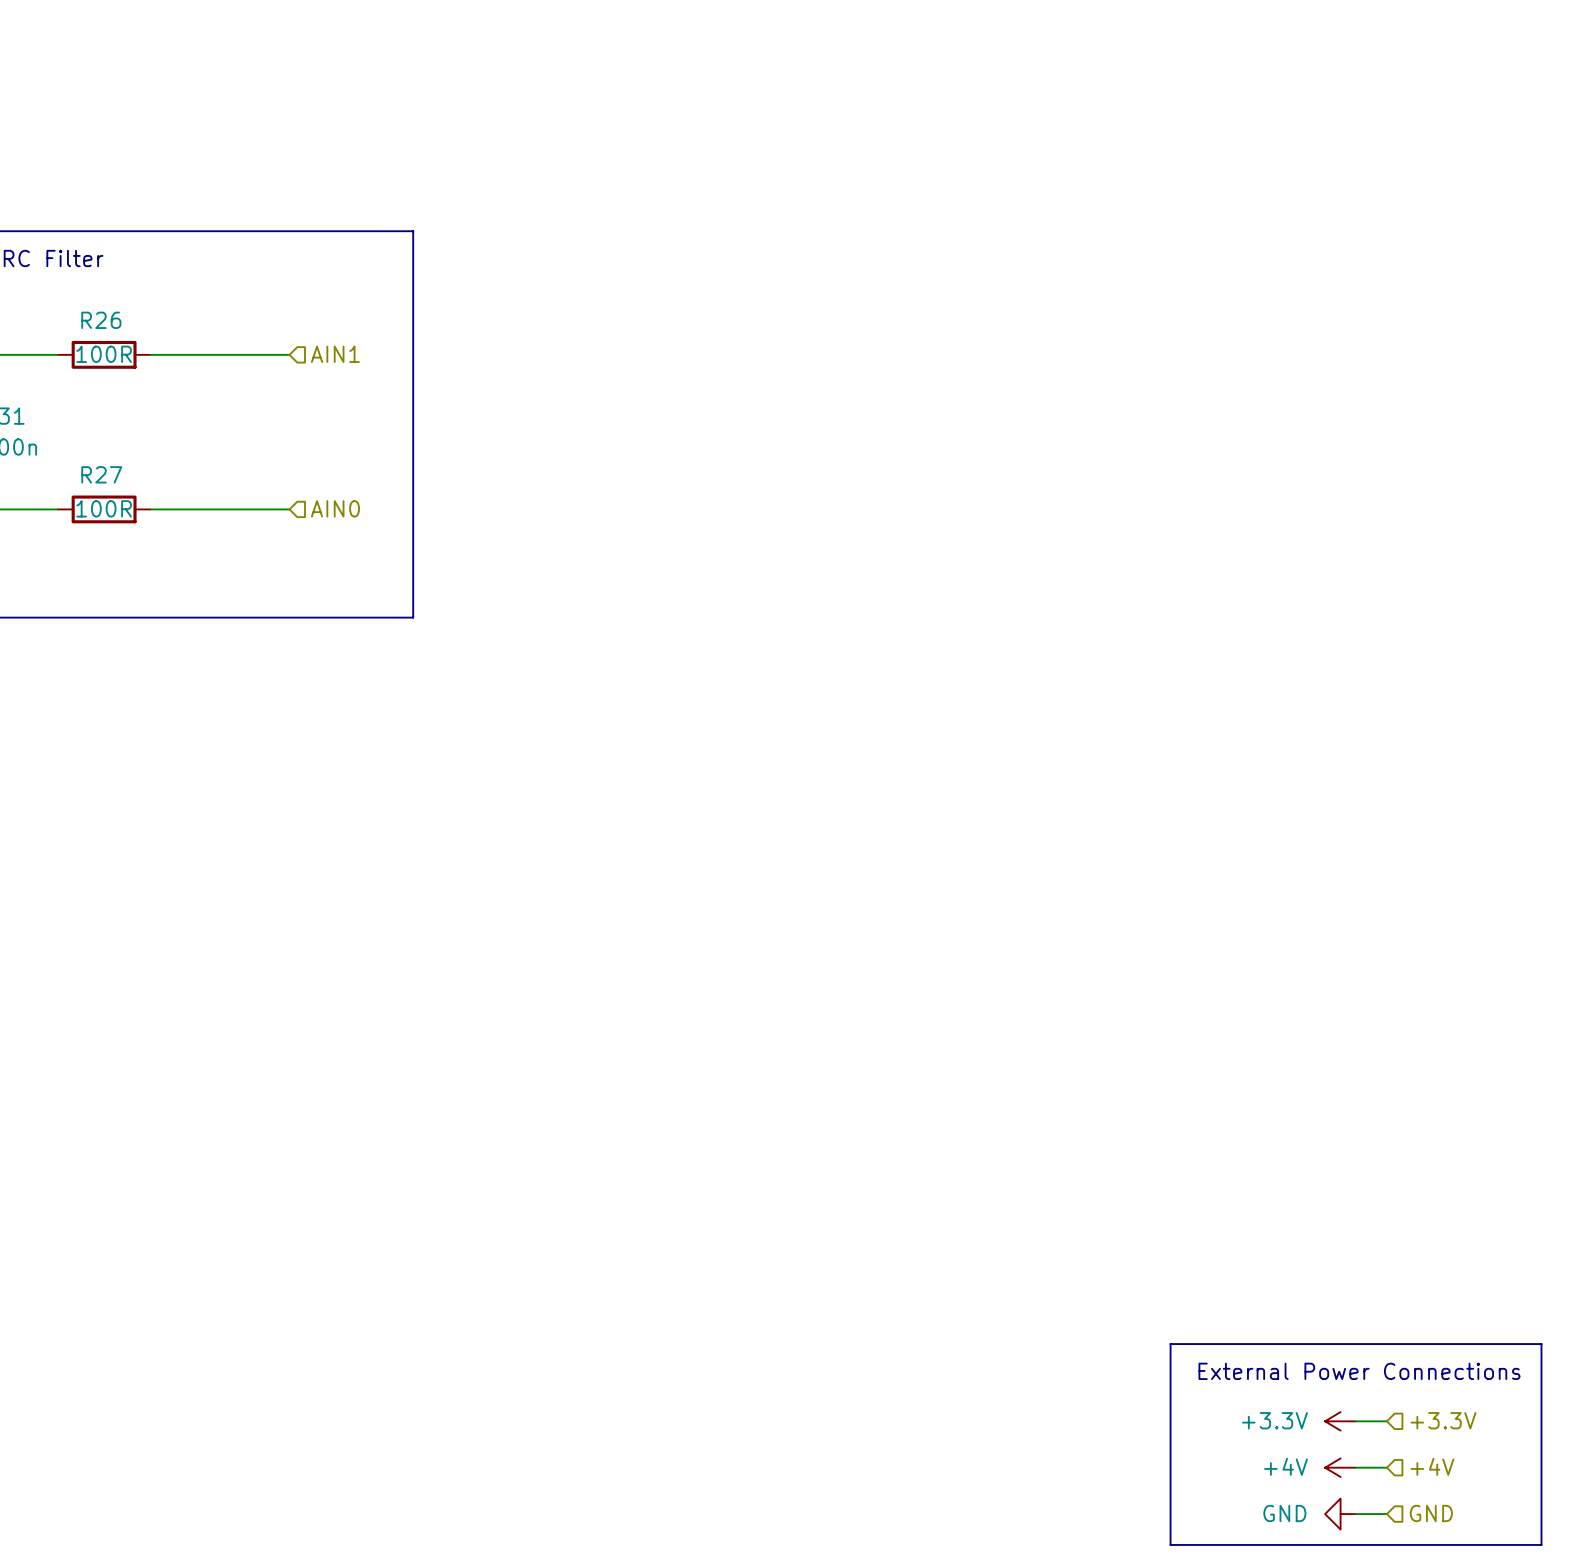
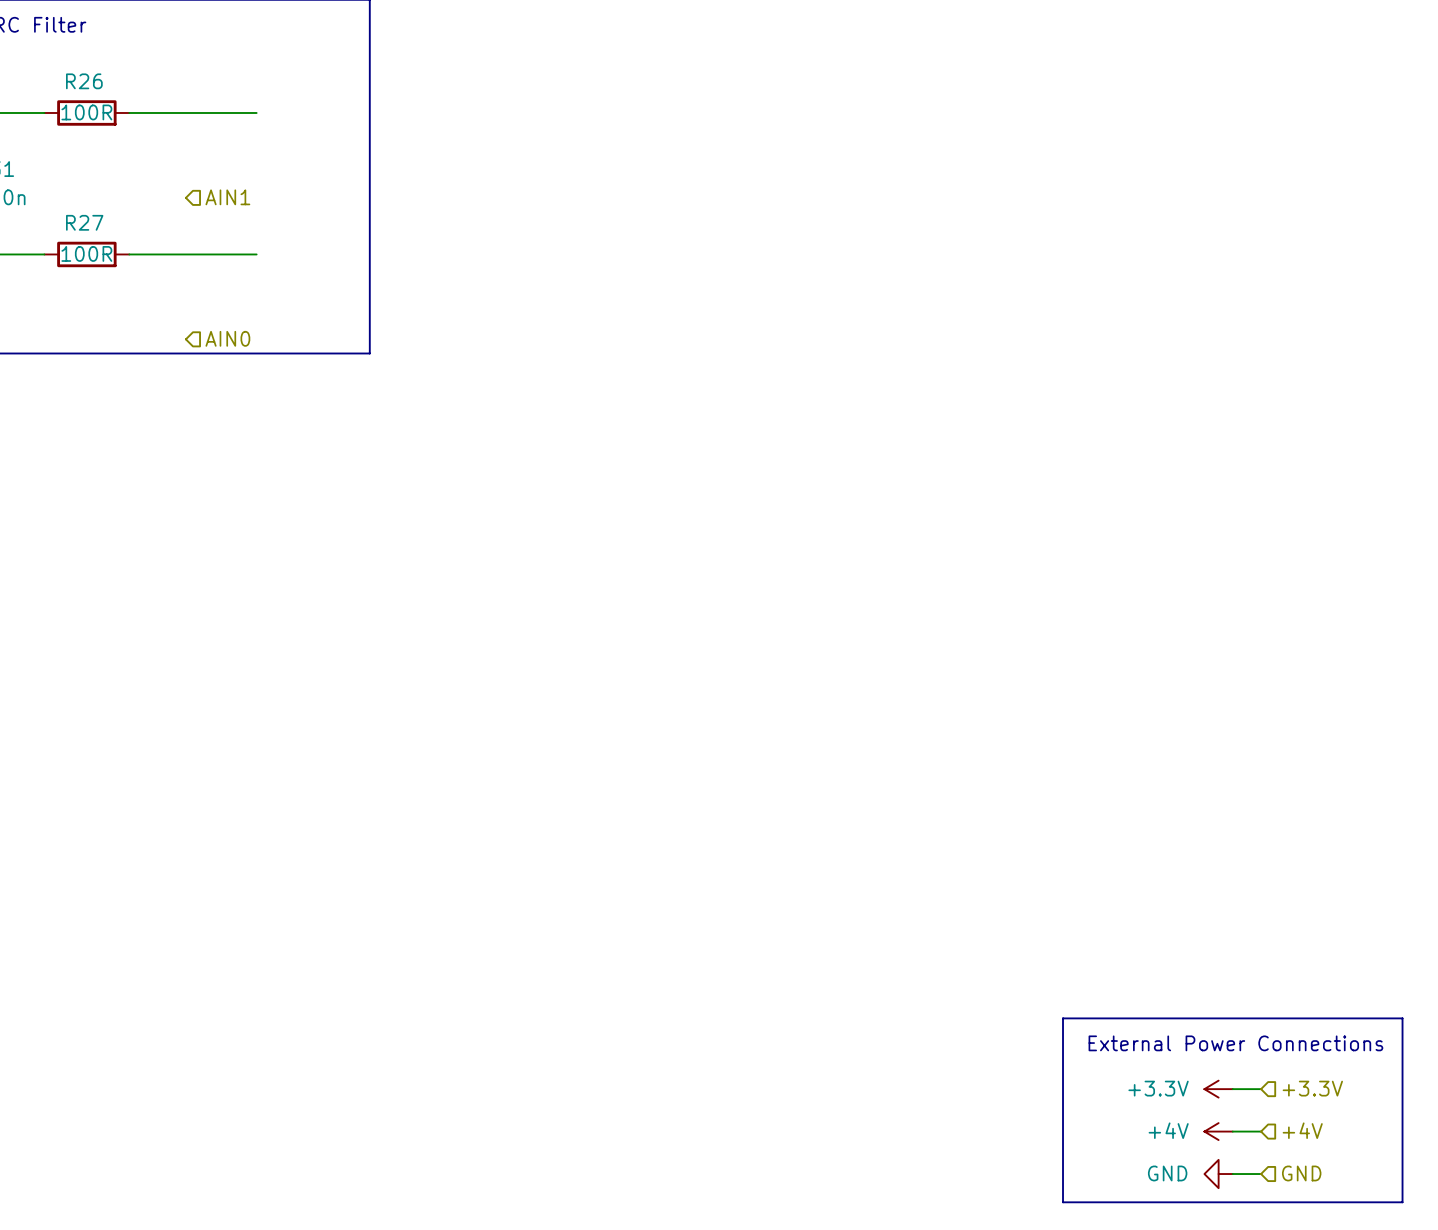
hierarchical label position: AIN1 (335, 354) -> AIN1 (227, 197)
hierarchical label position: AIN0 (335, 508) -> AIN0 (227, 338)

